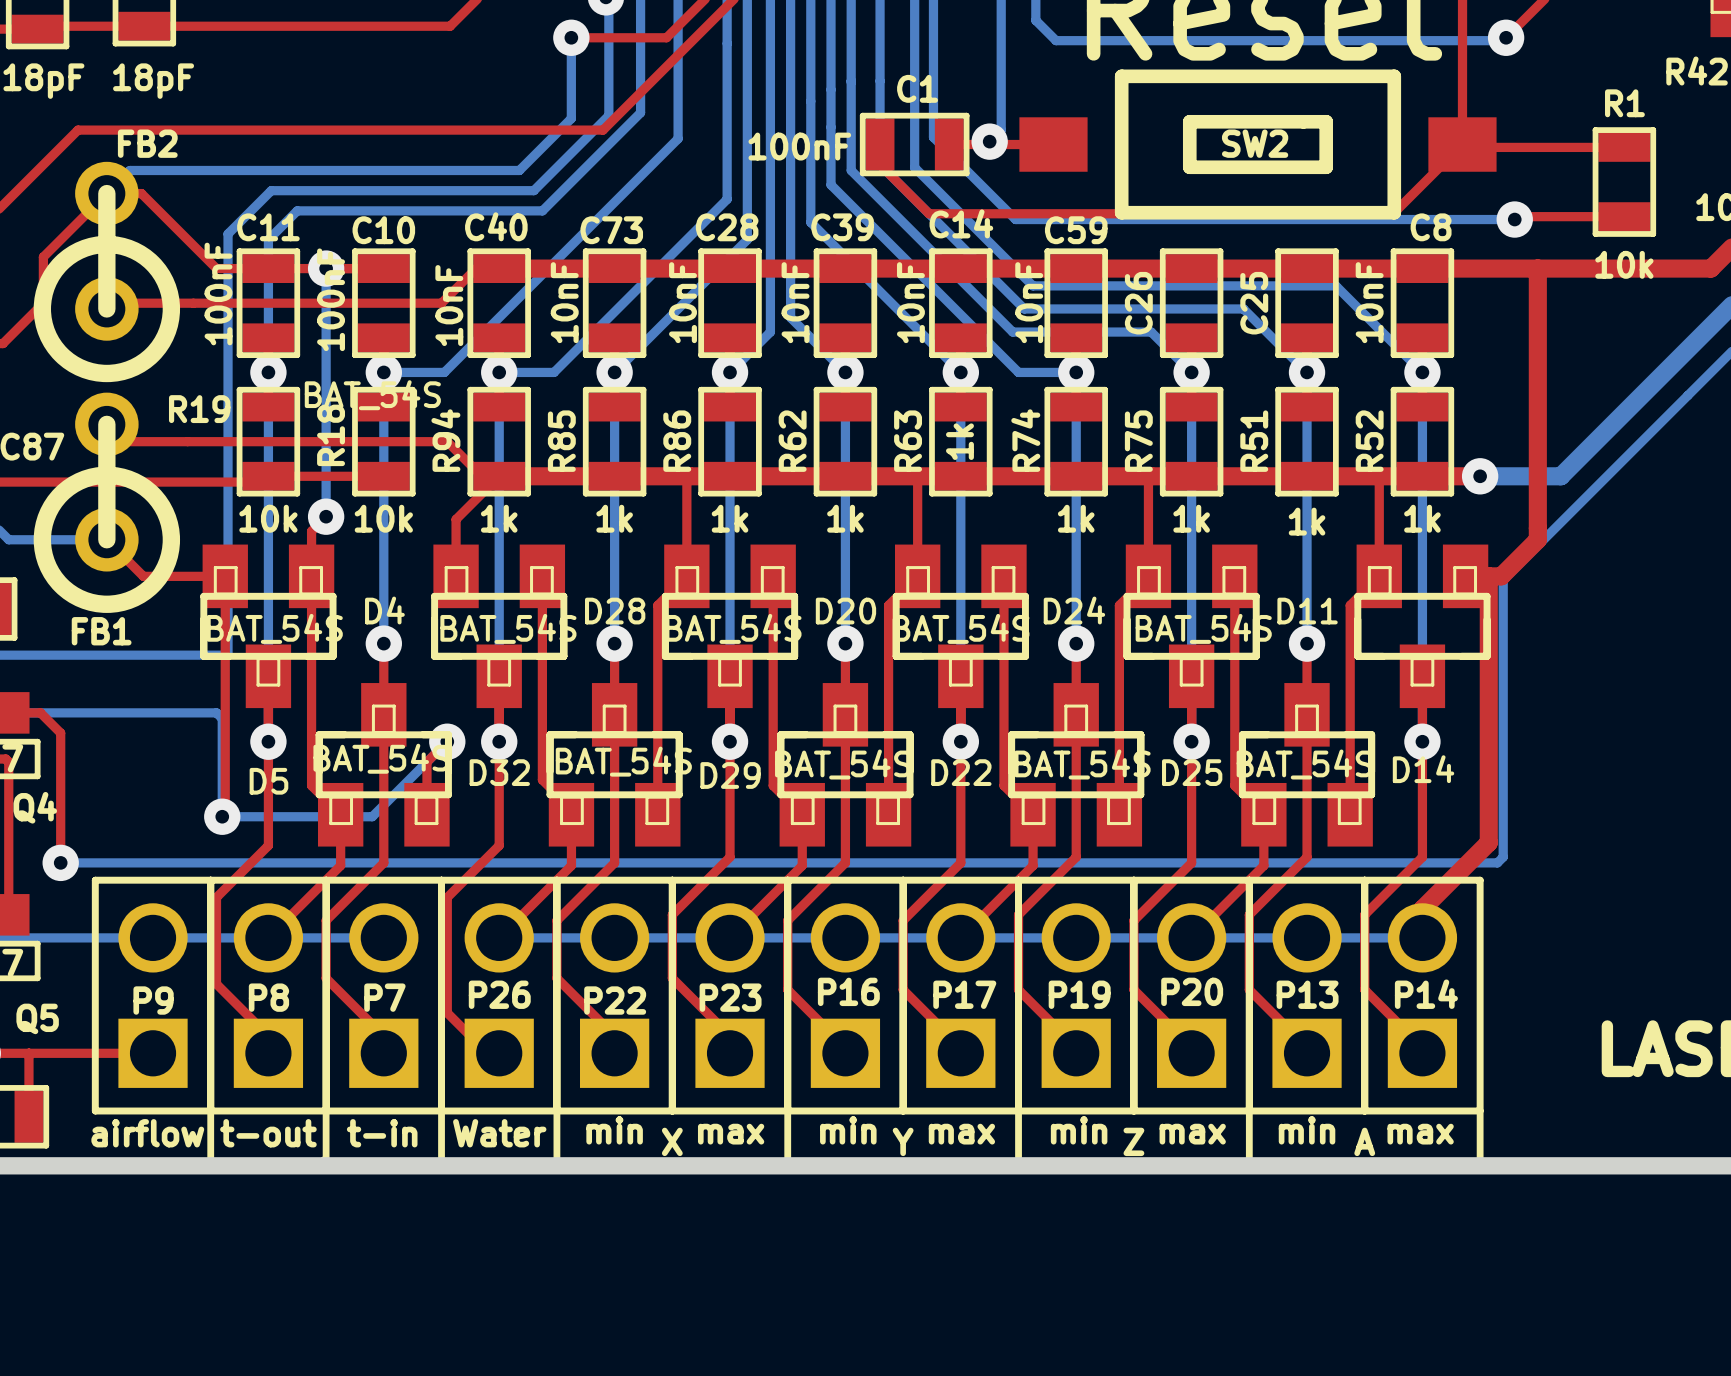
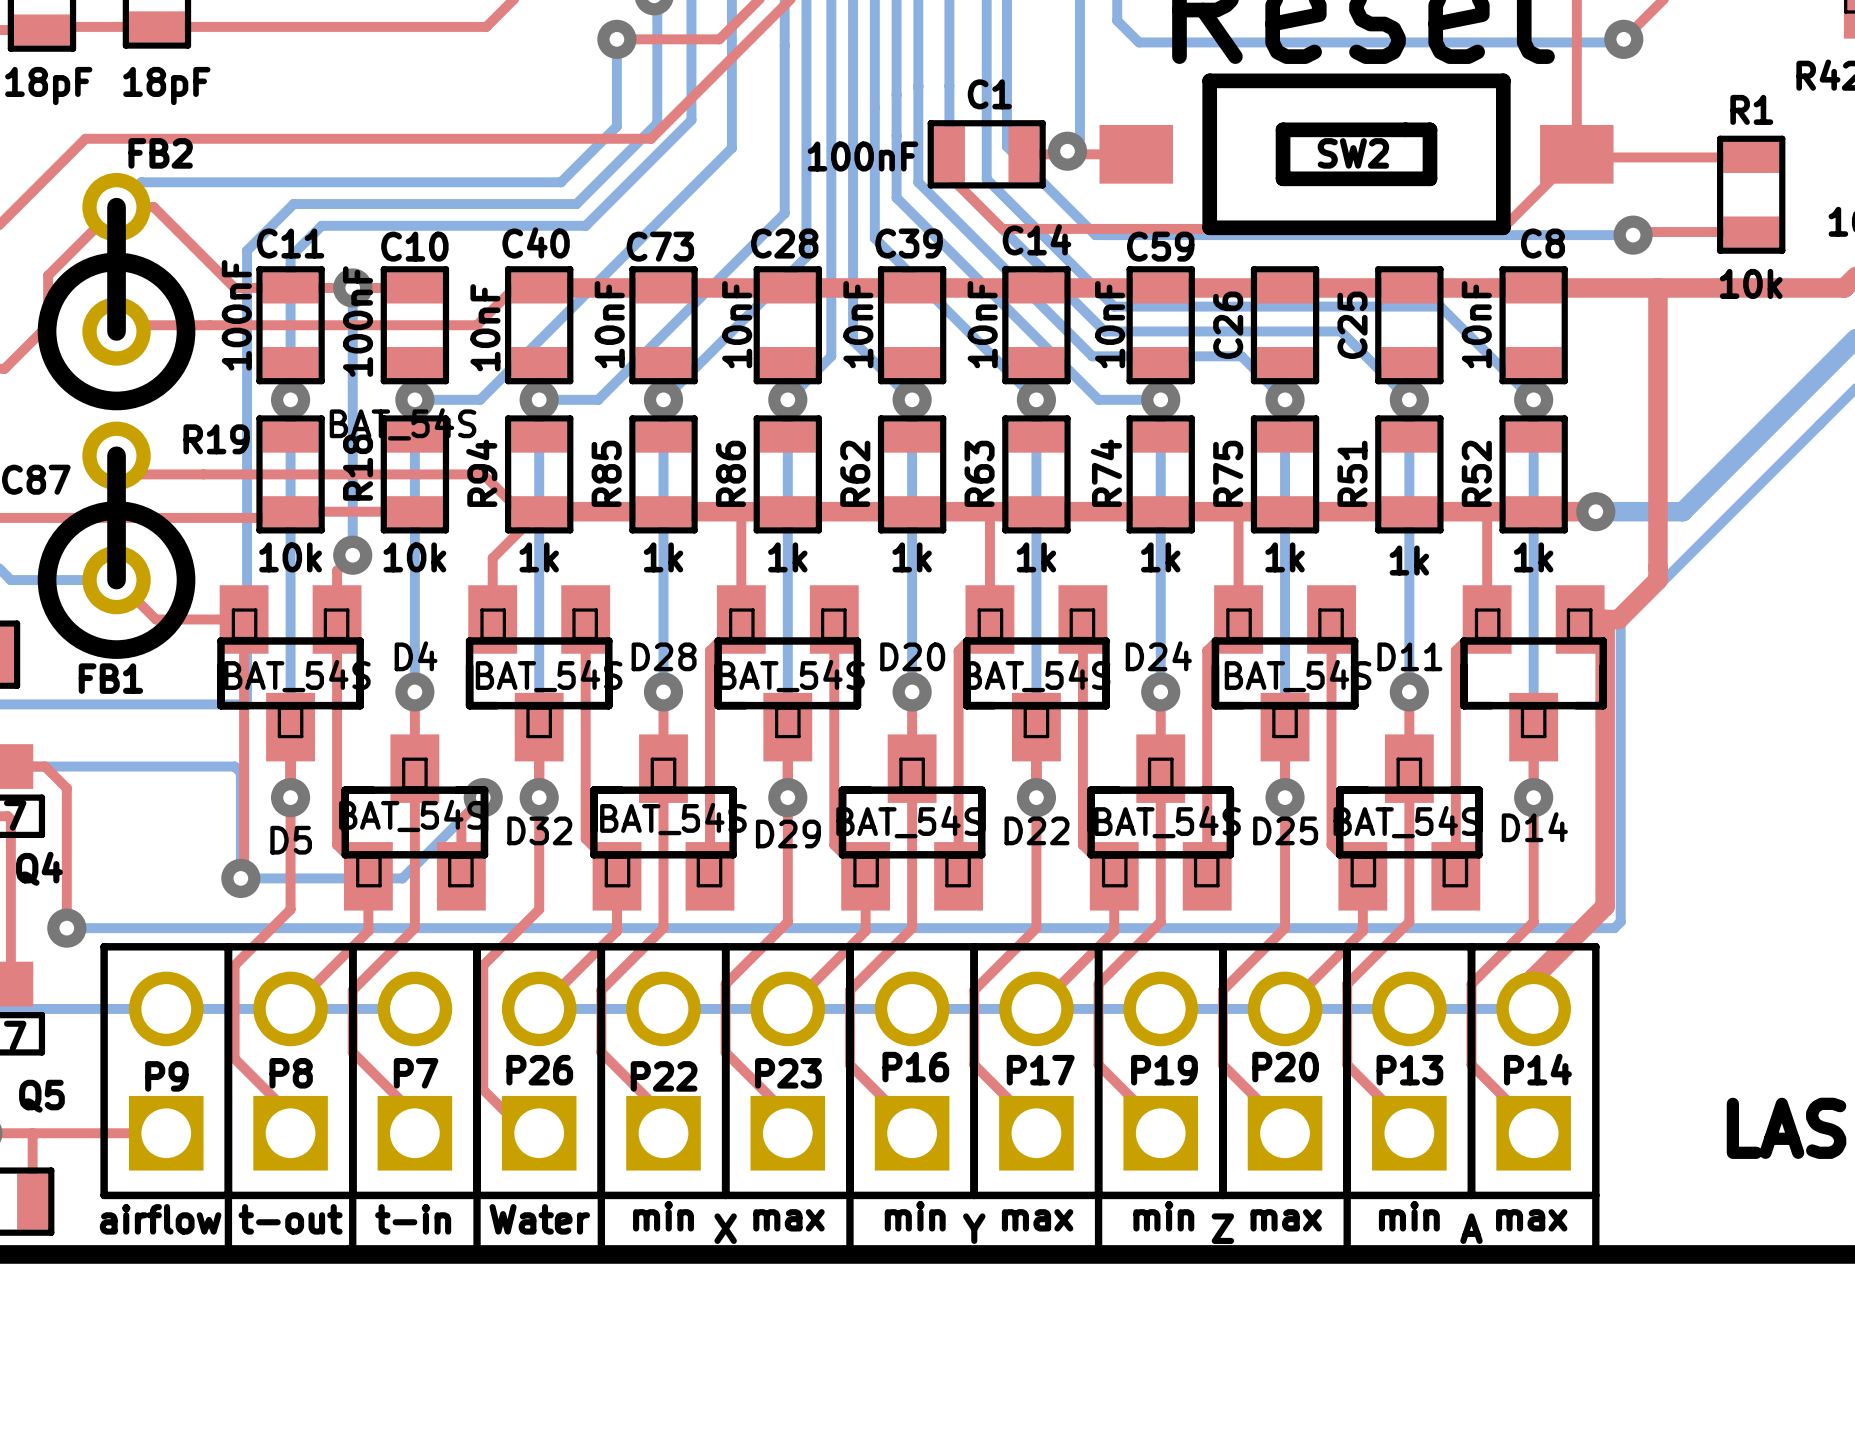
R63 value rotation: 0° (959, 441) -> 90° clockwise (1036, 557)
R63 value position: 1k (959, 441) -> 1k (1036, 557)

